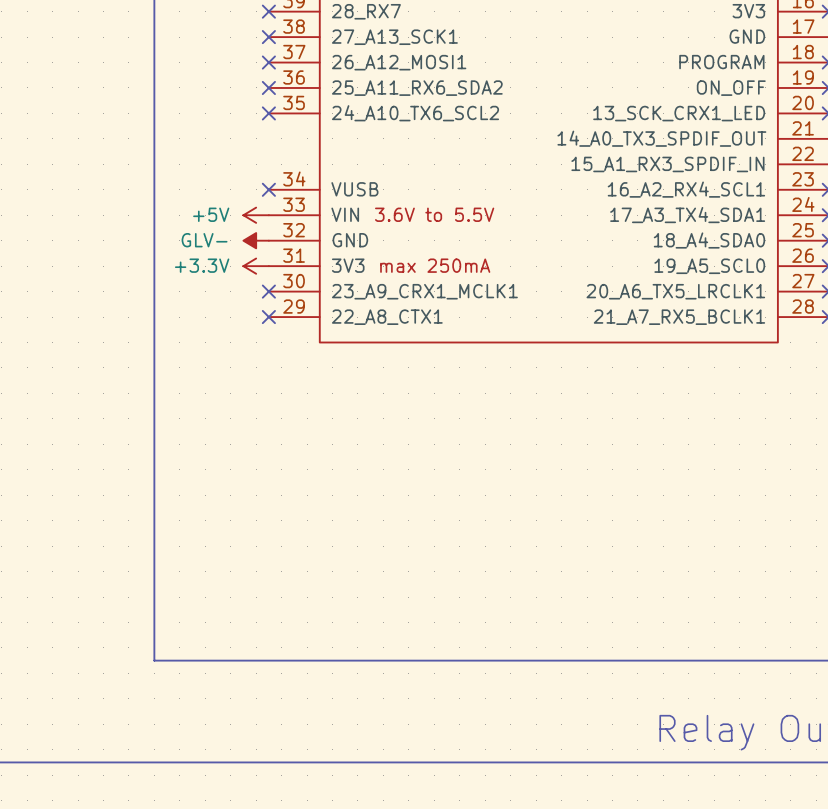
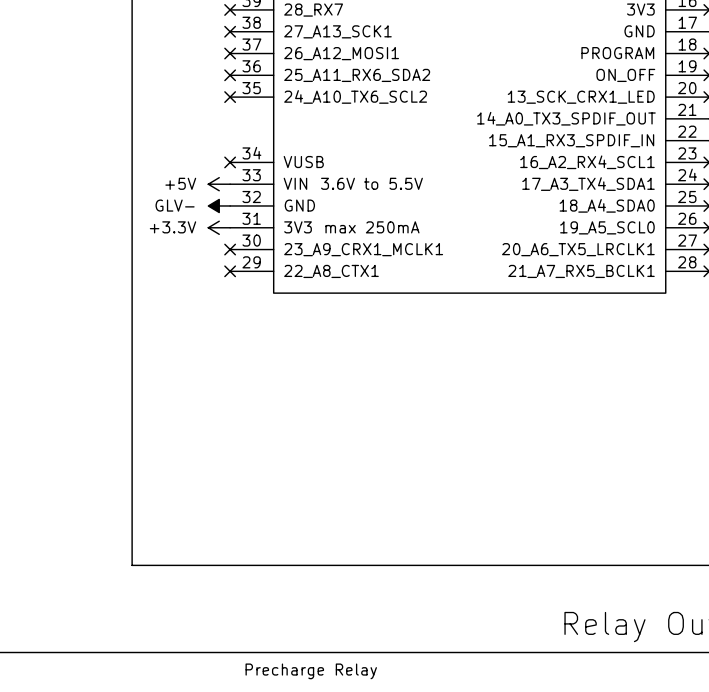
text: none -> Precharge Relay (311, 671)

